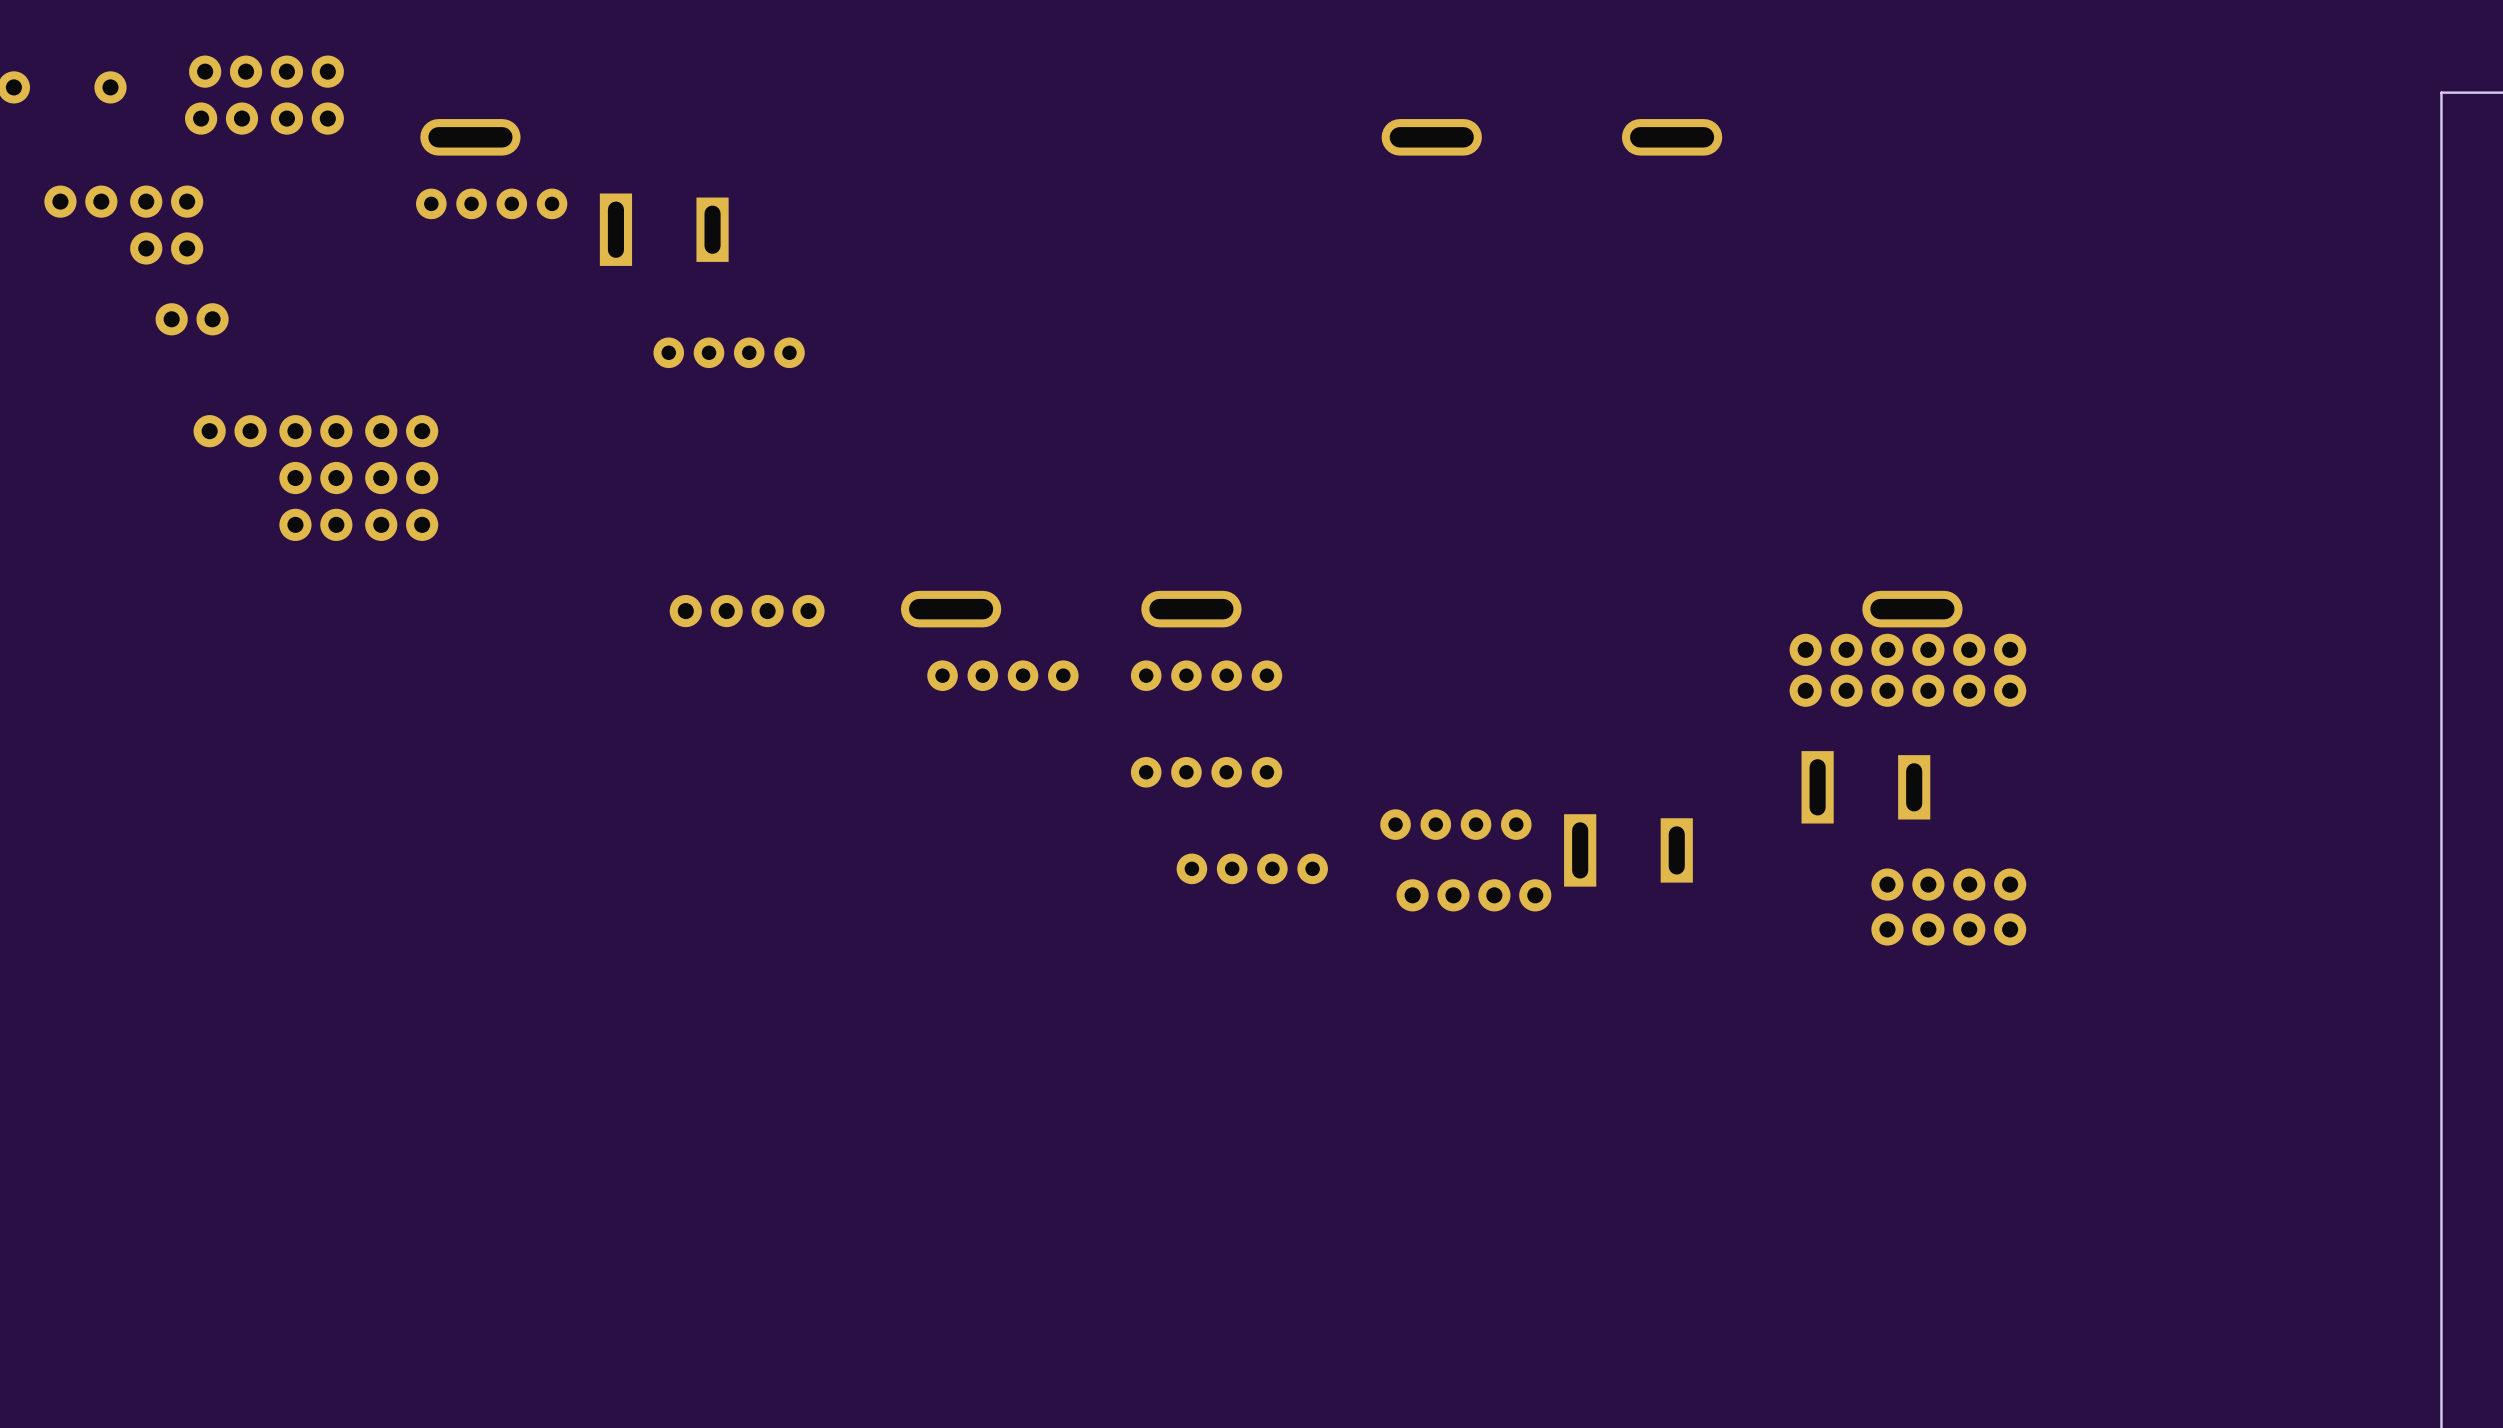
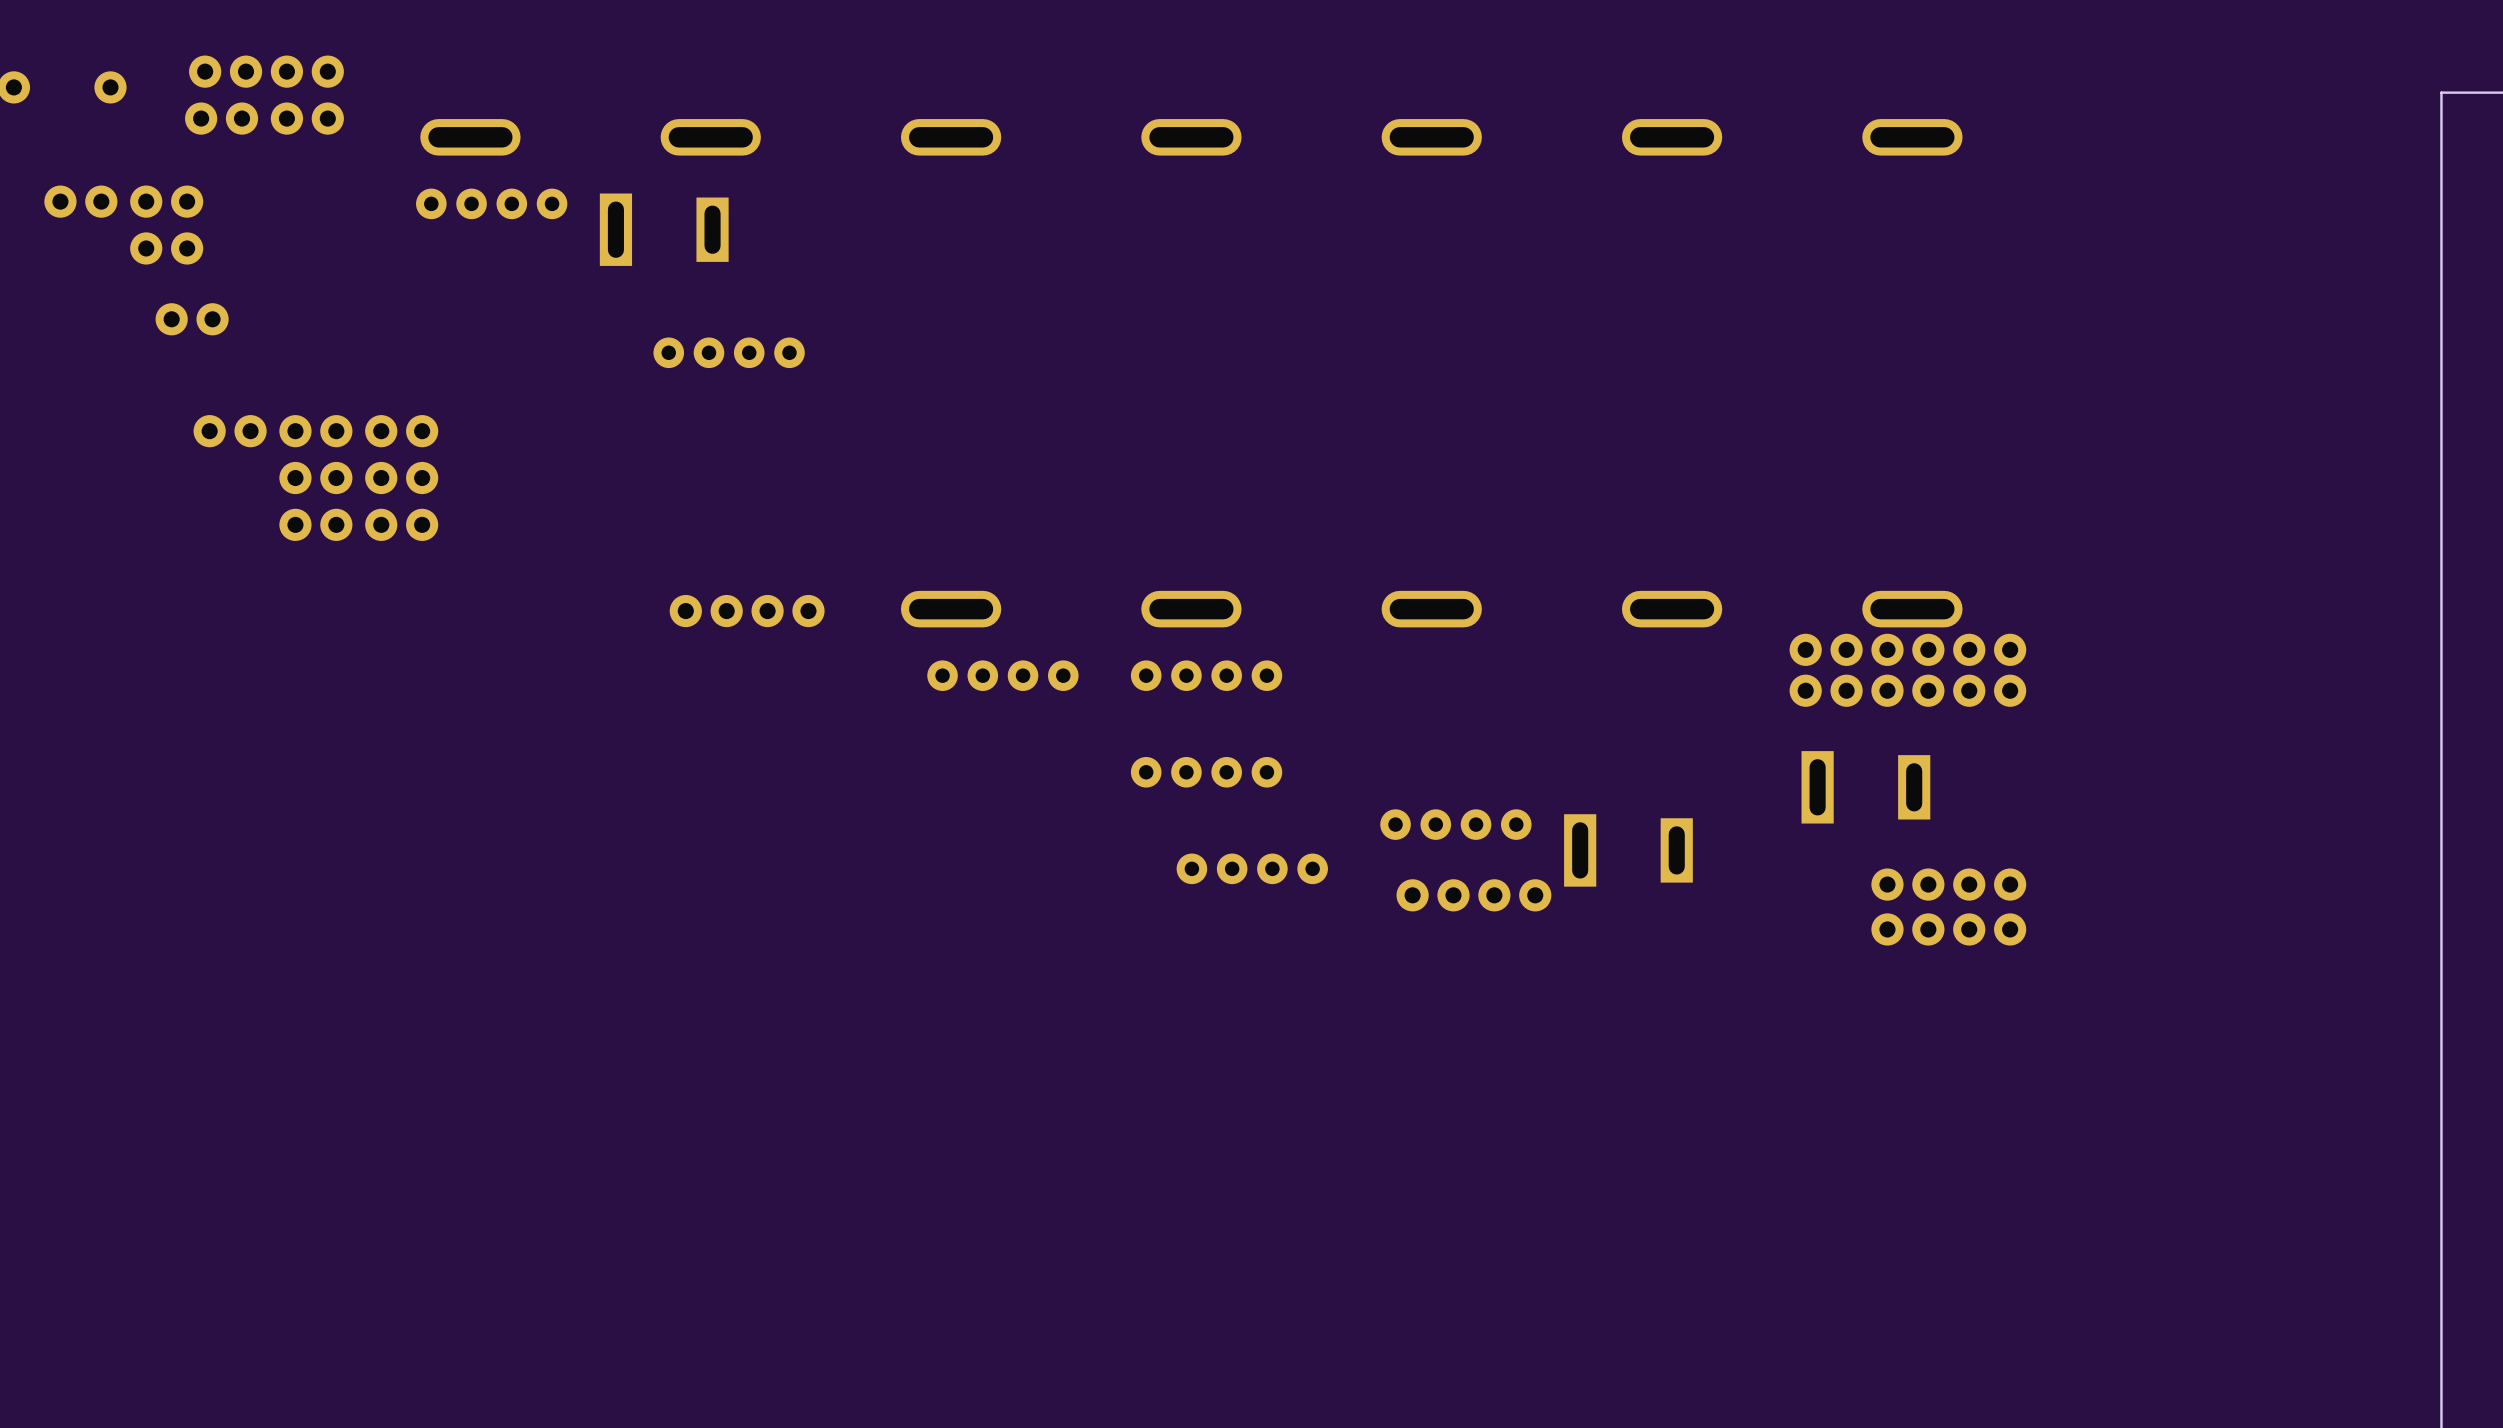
part: none -> (710, 137)
part: none -> (951, 137)
part: none -> (1191, 137)
part: none -> (1912, 137)
part: none -> (1431, 609)
part: none -> (1672, 609)

